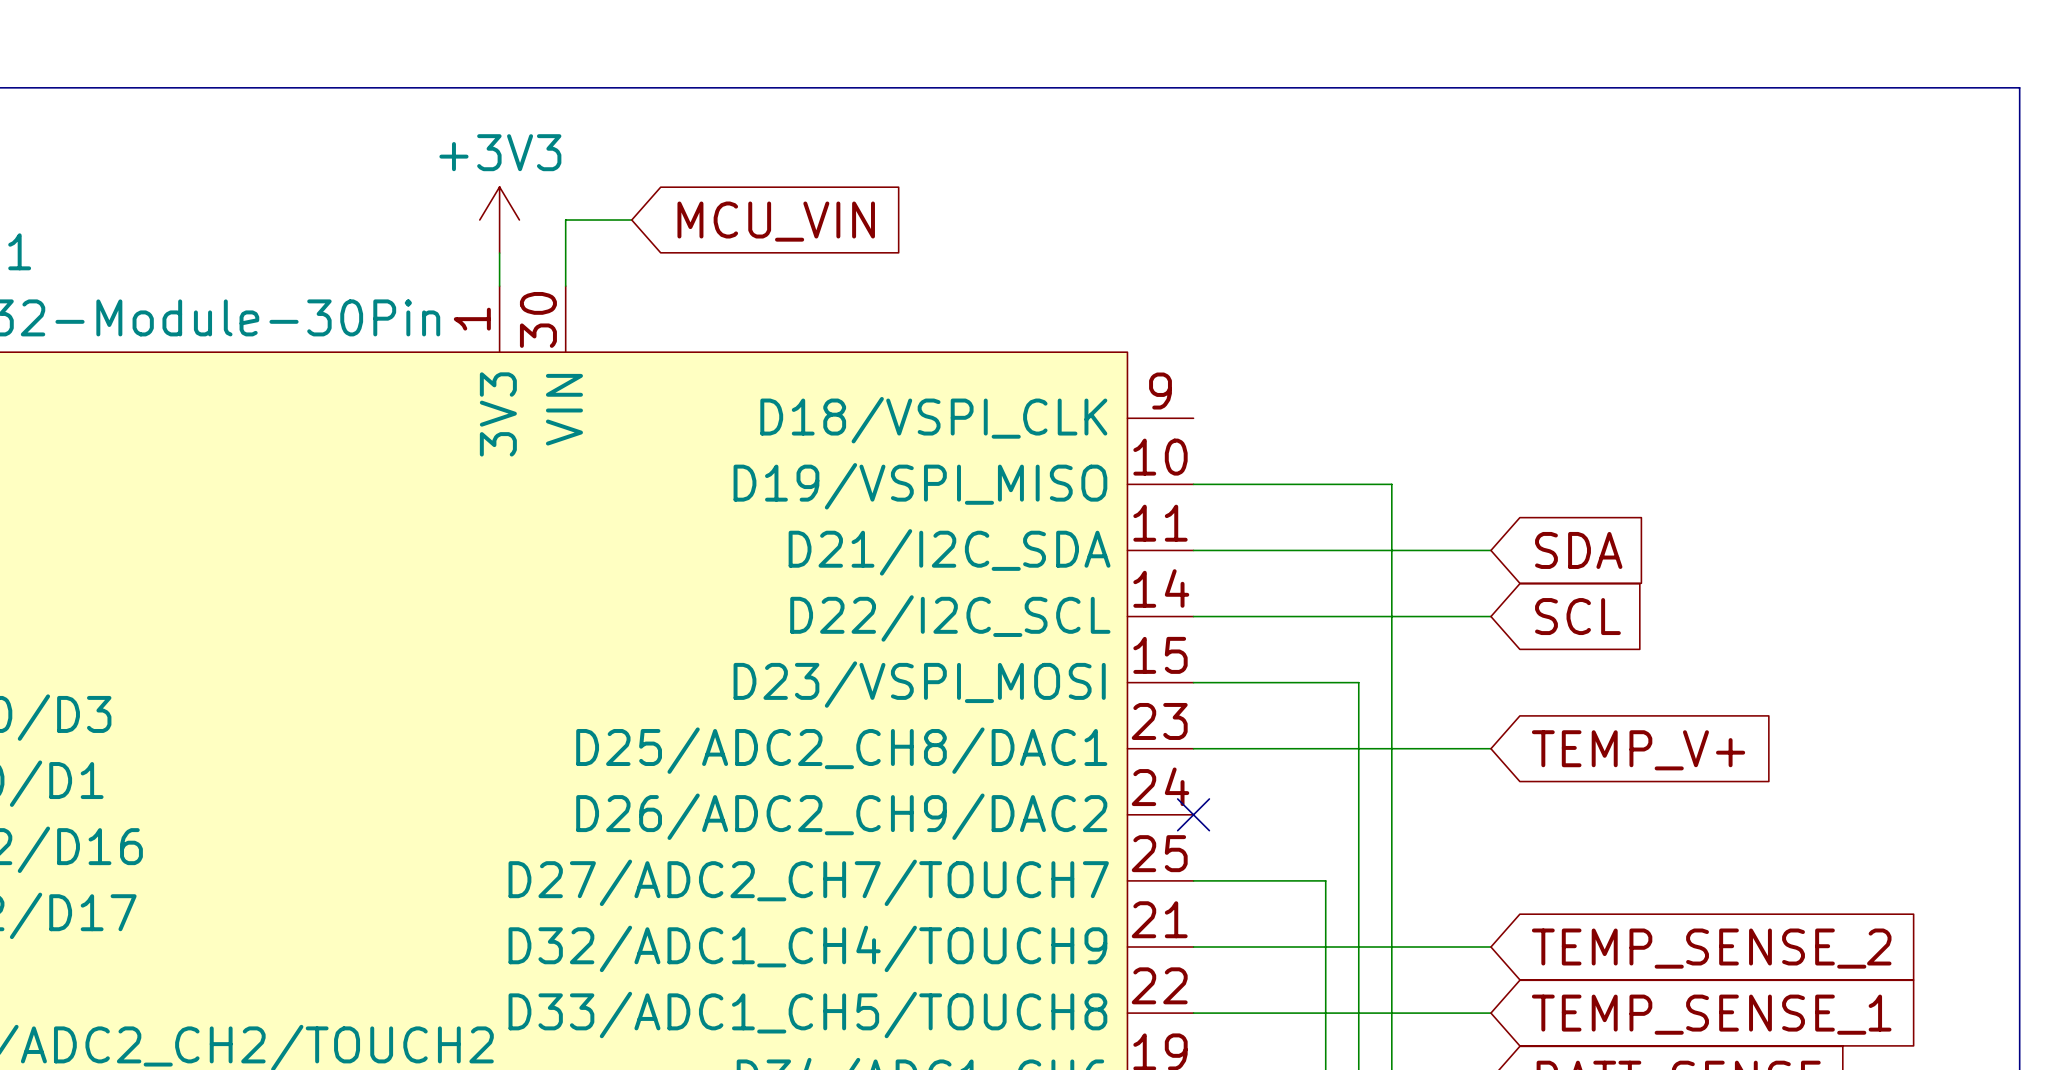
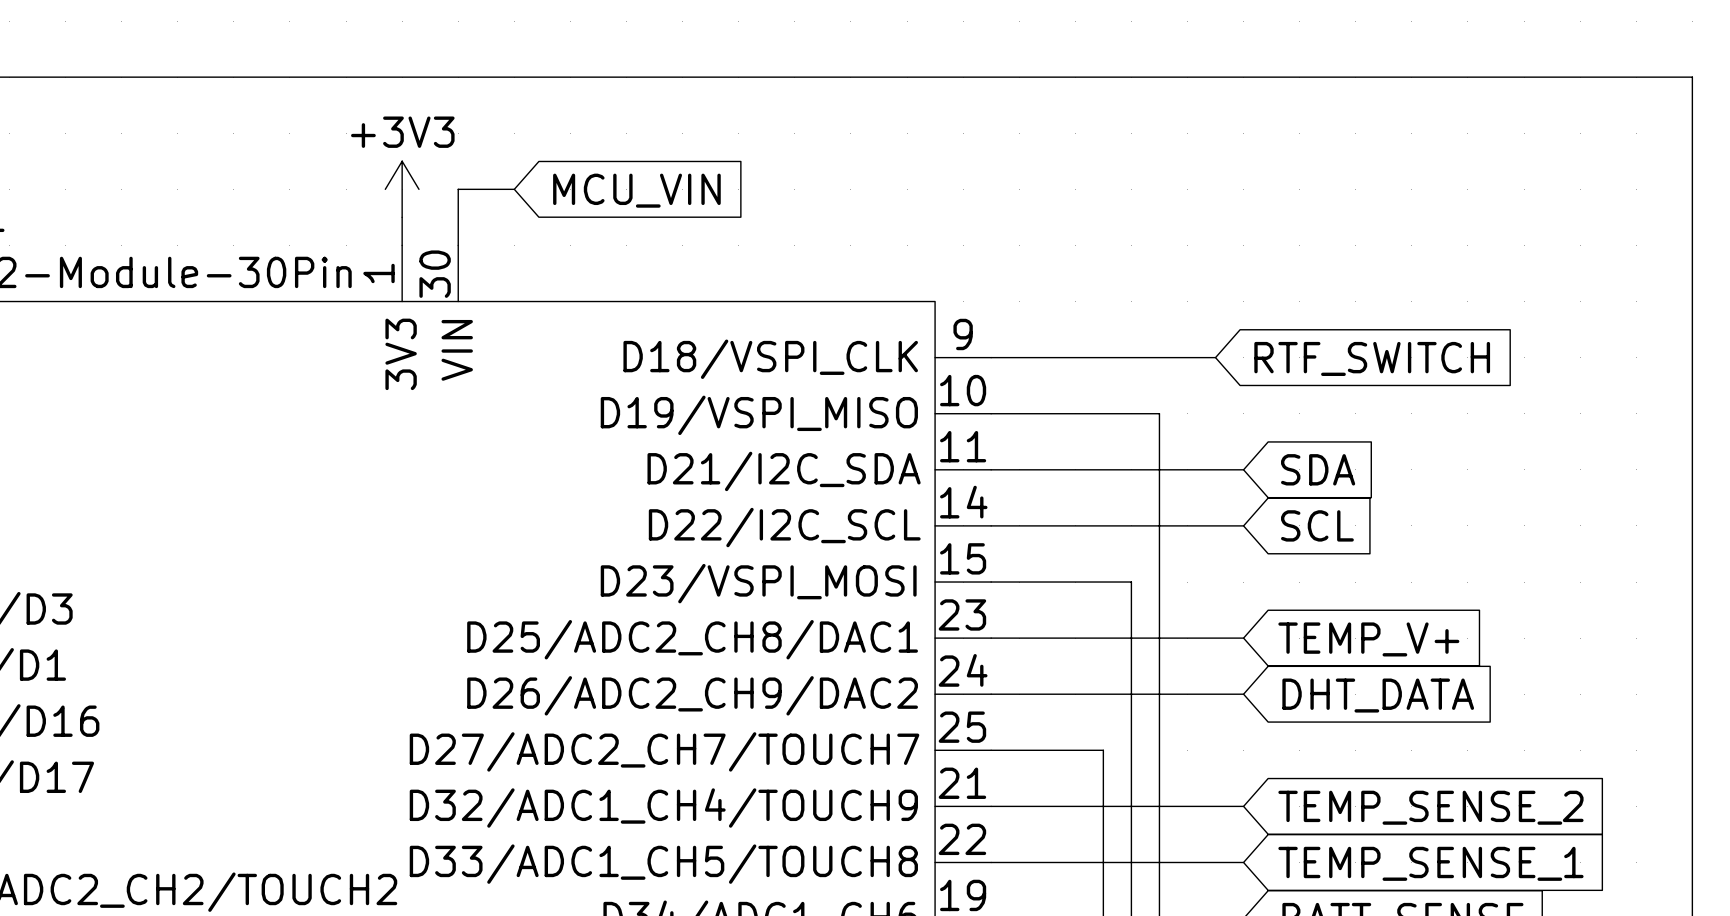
wire: none -> (991, 357) (1215, 357)
global label: none -> RTF_SWITCH (1372, 358)
wire: none -> (991, 694) (1243, 694)
no-connect mark: (1193, 814) -> none
global label: none -> DHT_DATA (1378, 695)

